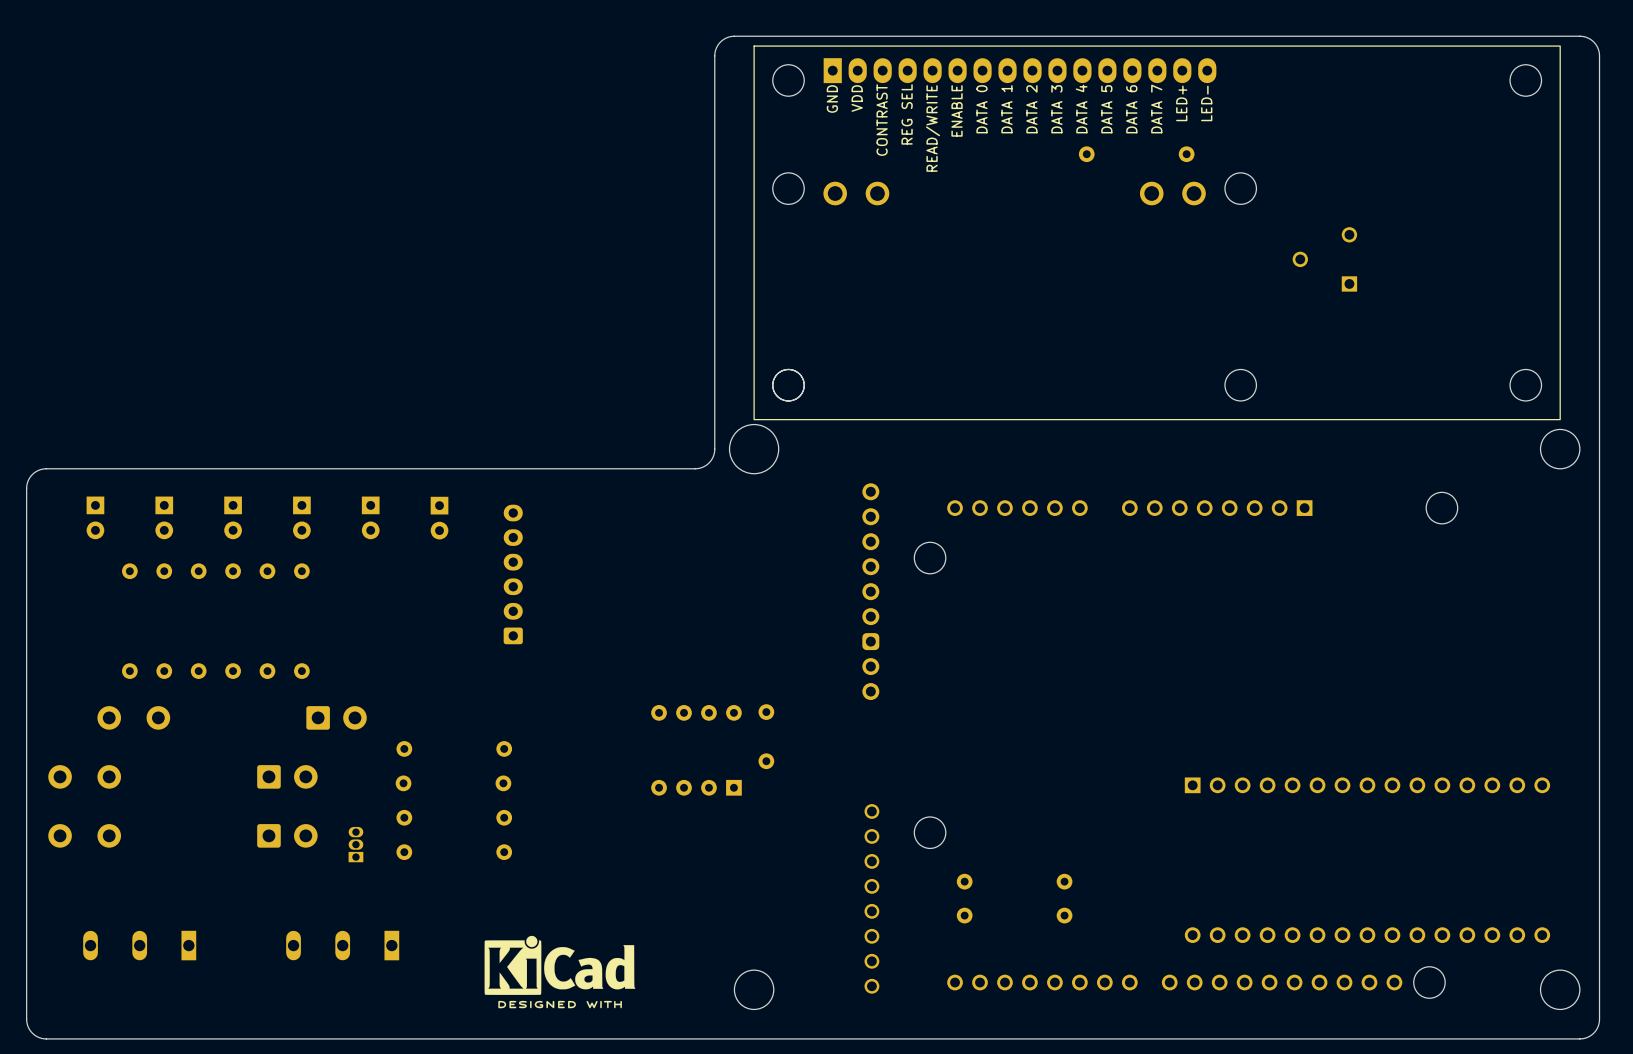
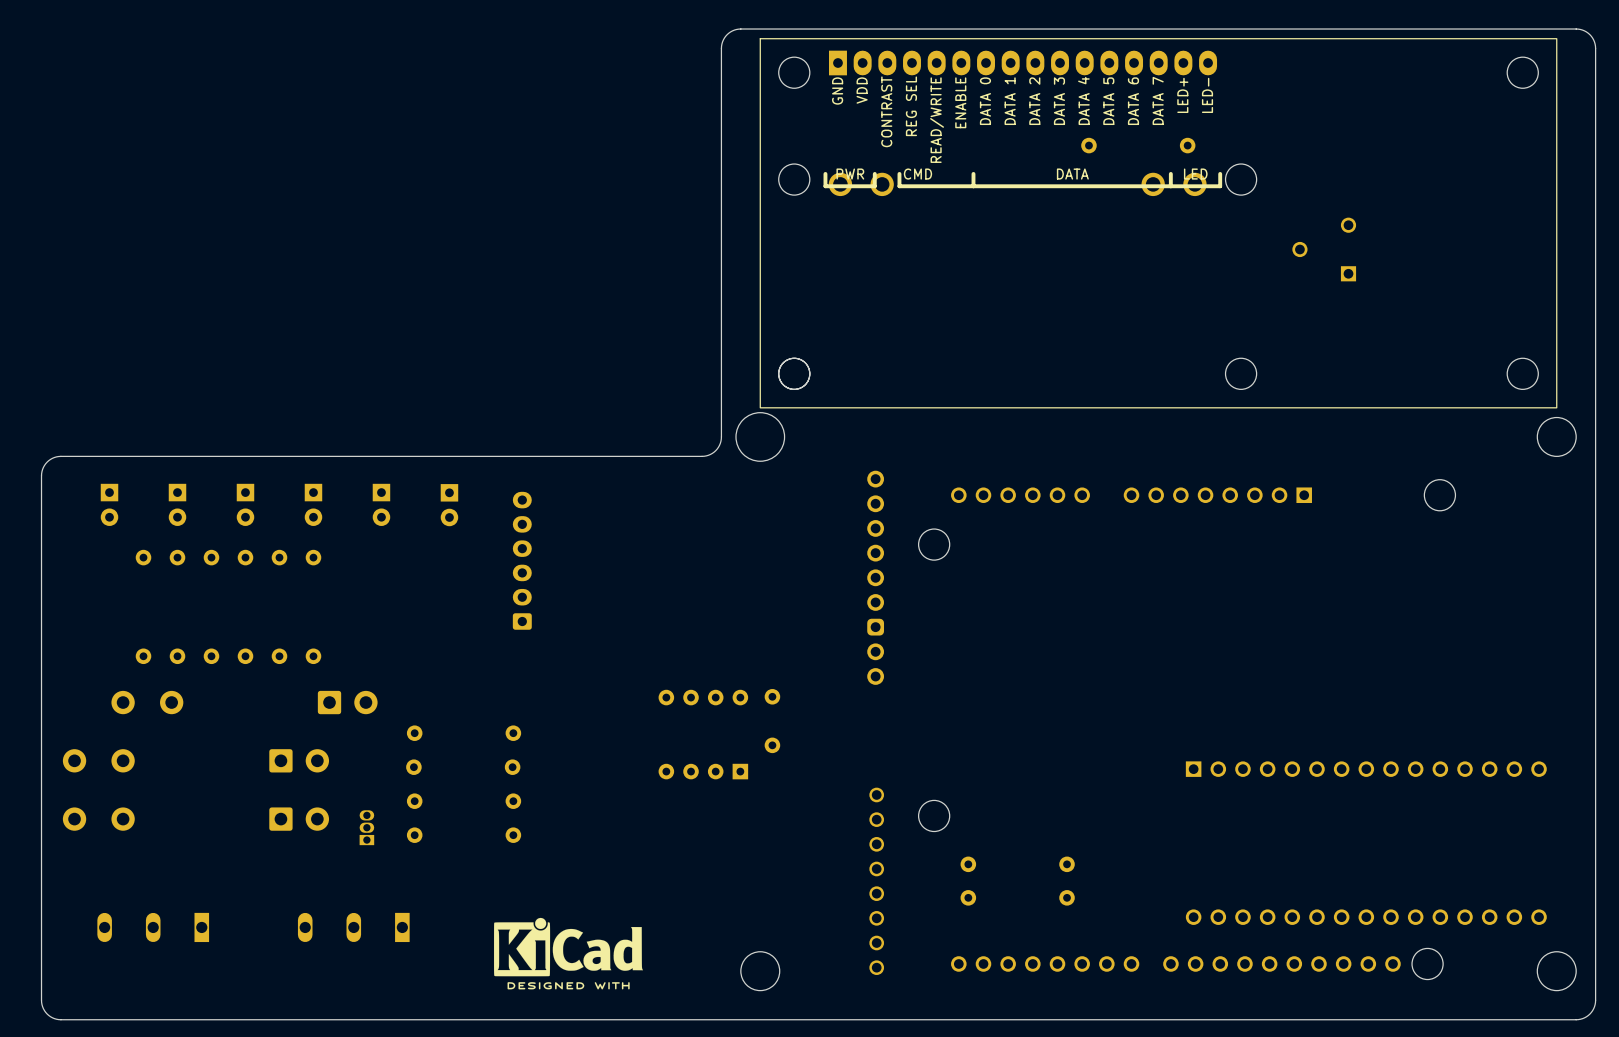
part footprint: [753, 45, 1561, 421] -> [759, 38, 1558, 409]

